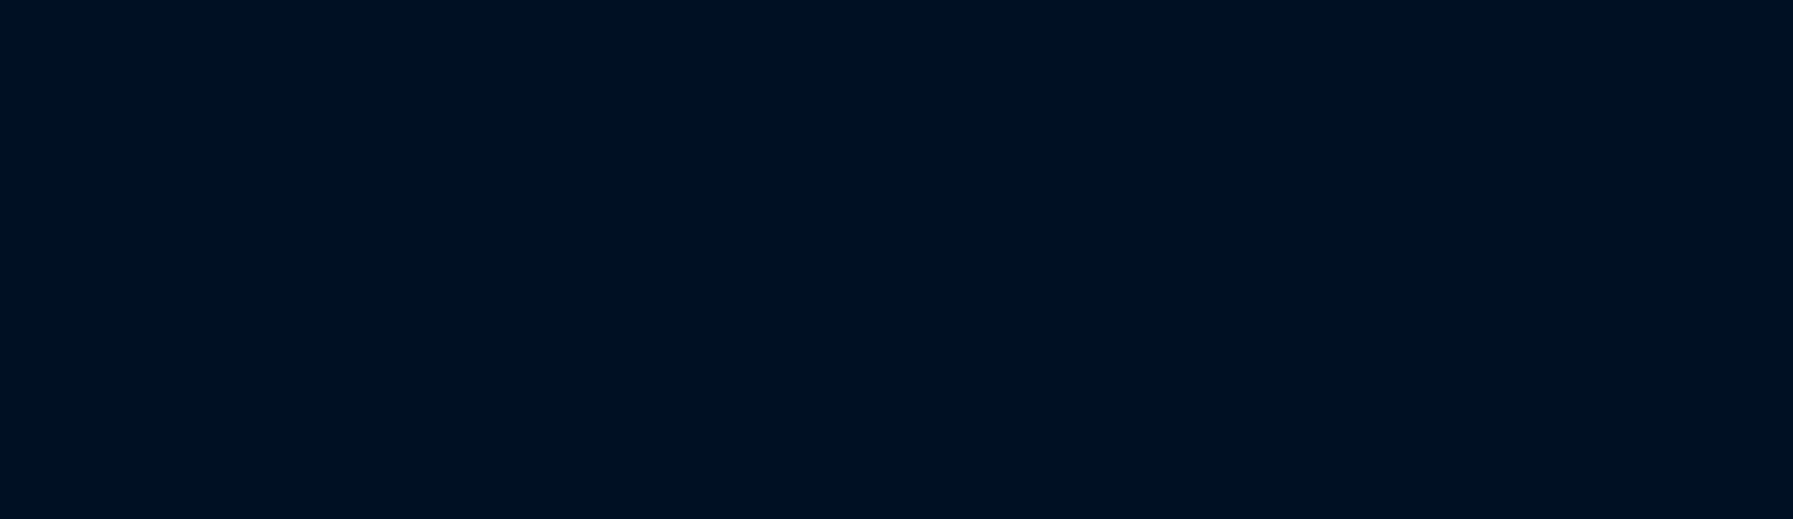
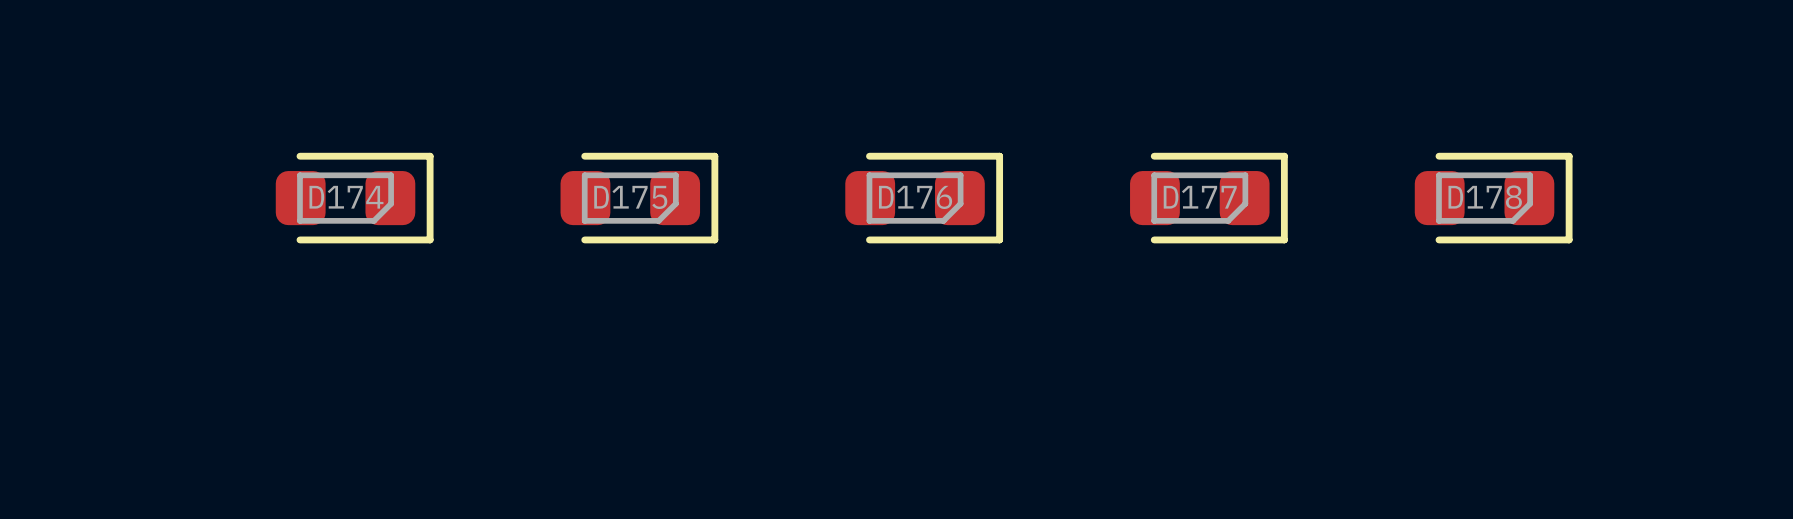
D174: none -> (354, 198)
D175: none -> (639, 198)
D176: none -> (924, 198)
D177: none -> (1208, 198)
D178: none -> (1493, 198)

